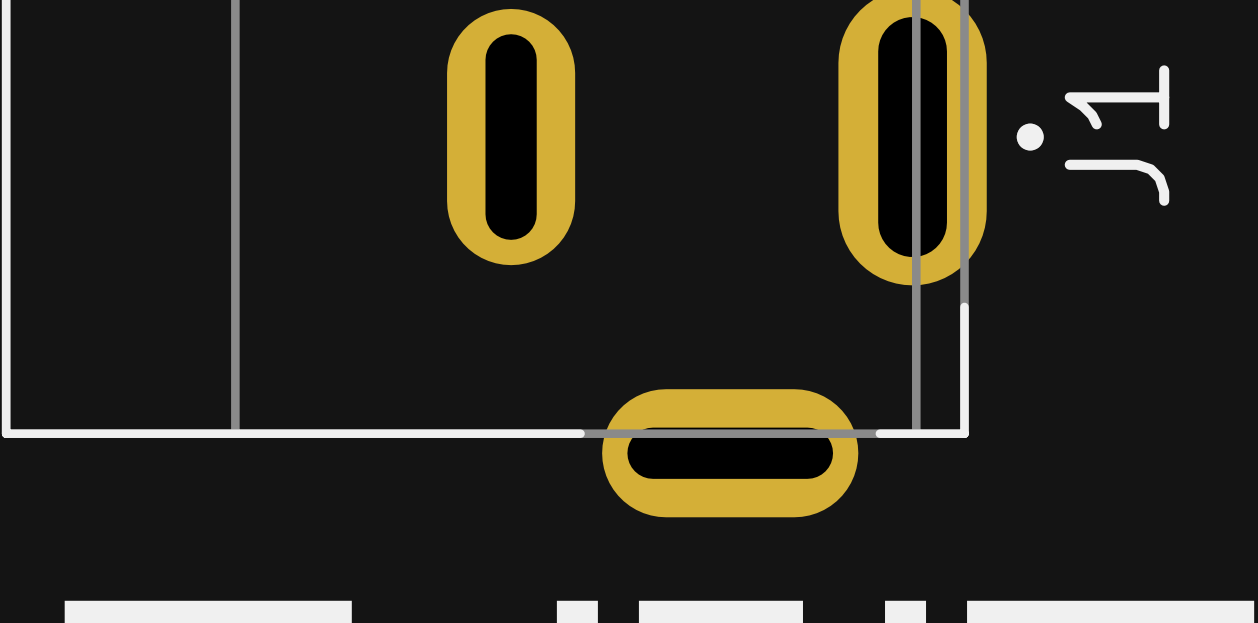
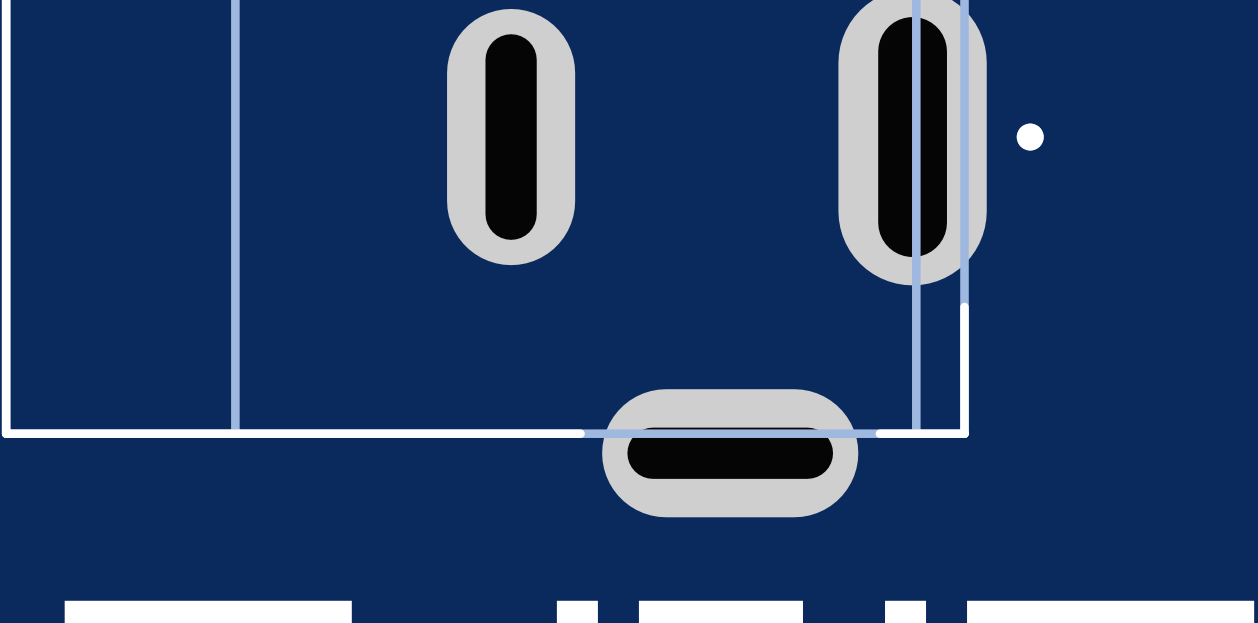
J1 name: J1 (1116, 135) -> none

